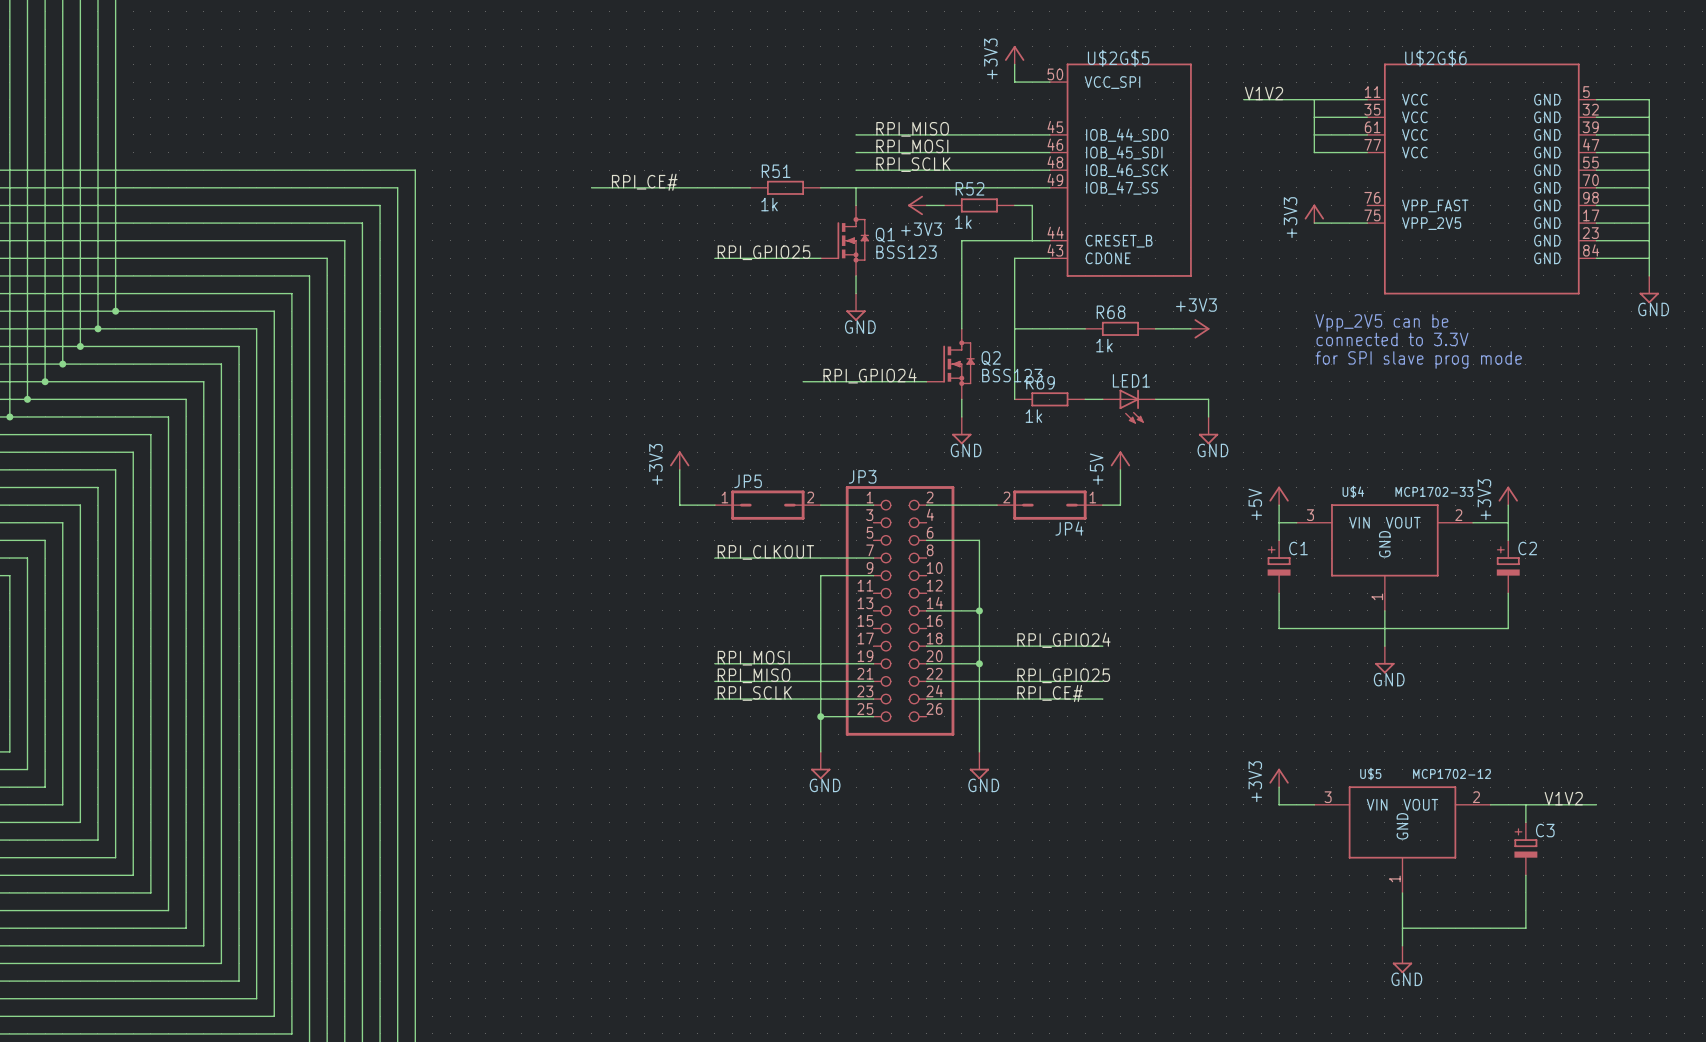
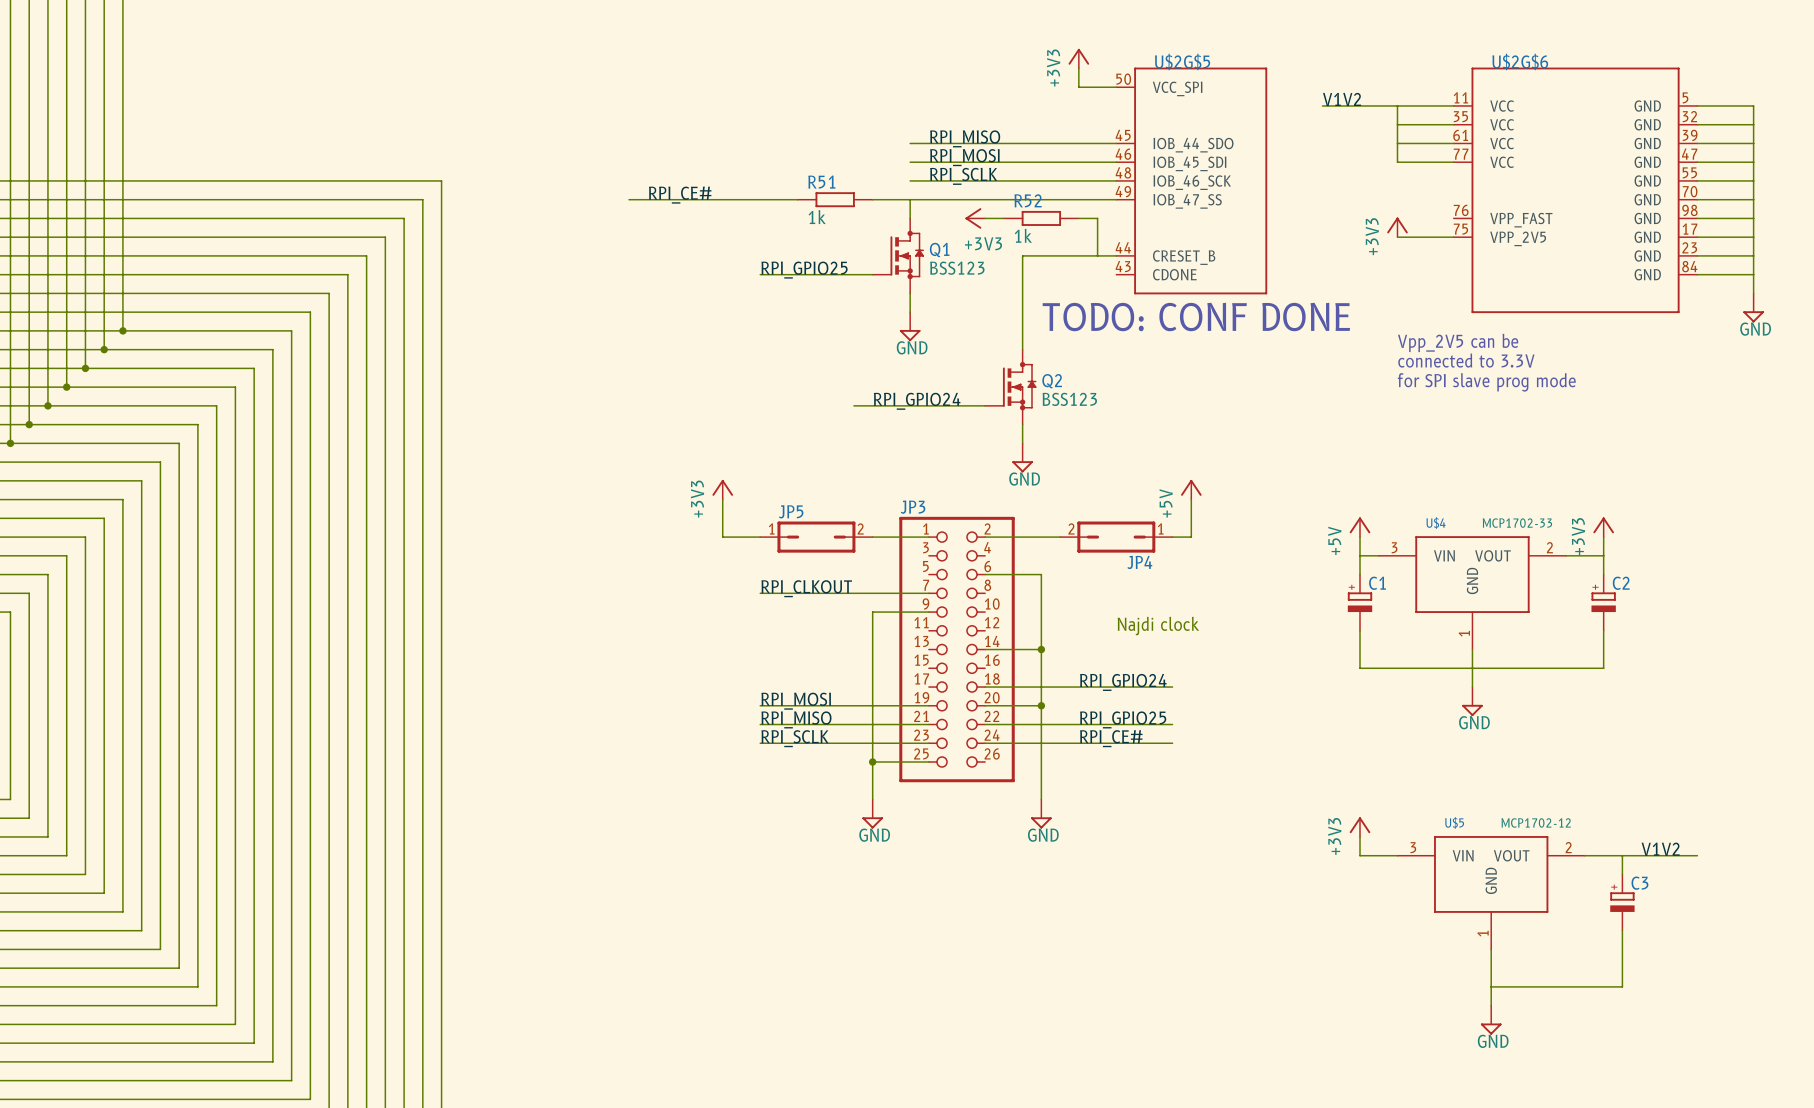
wire: (1049, 258) (1014, 258) (1014, 399) -> none
text: none -> TODO: CONF DONE (1196, 317)
wire: (1014, 328) (1085, 328) -> none
R68: 1k (1120, 328) -> none
wire: (1155, 328) (1190, 328) -> none
power symbol: +3V3 (1200, 328) -> none
R69: 1k (1049, 399) -> none
wire: (1085, 399) (1102, 399) -> none
wire: (1155, 399) (1208, 399) (1208, 416) -> none
LED1: (1129, 406) -> none
power symbol: GND (1208, 430) -> none
text: none -> Najdi clock (1158, 626)

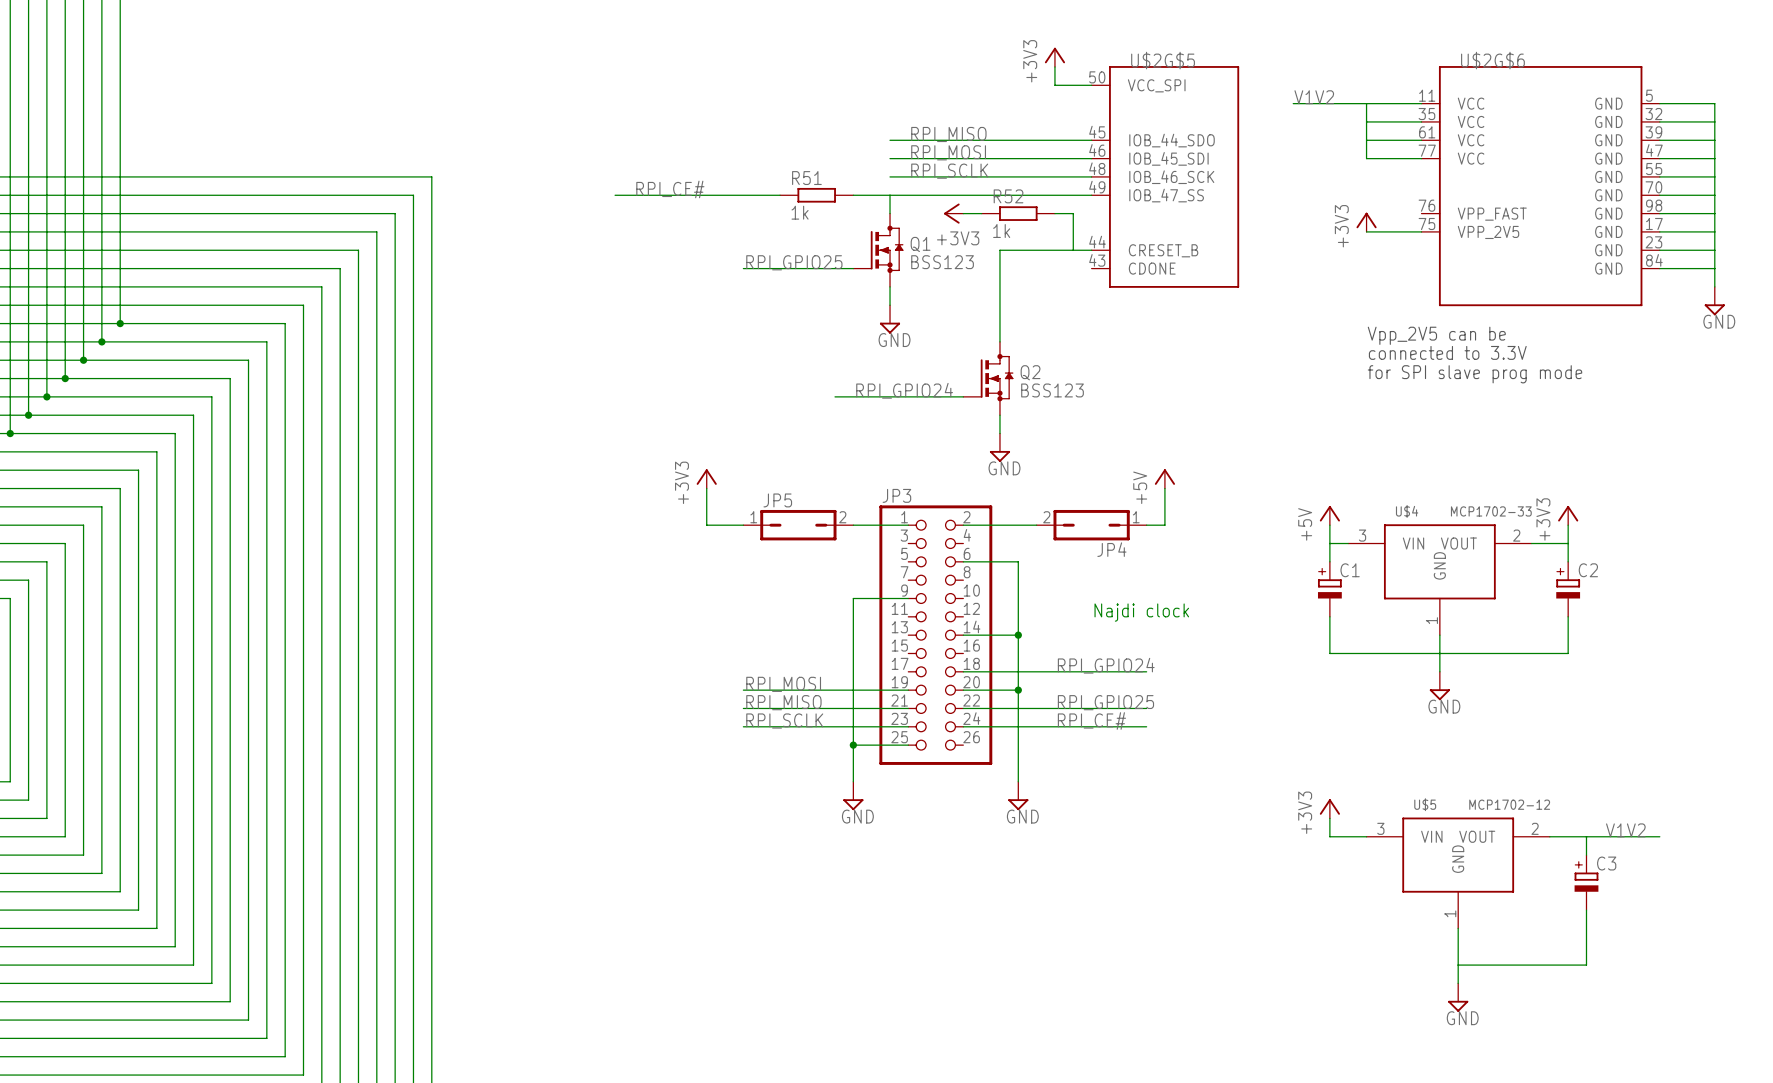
text: TODO: CONF DONE (1196, 317) -> none
label: RPI_CLKOUT (806, 588) -> none
wire: (760, 593) (928, 593) -> none

